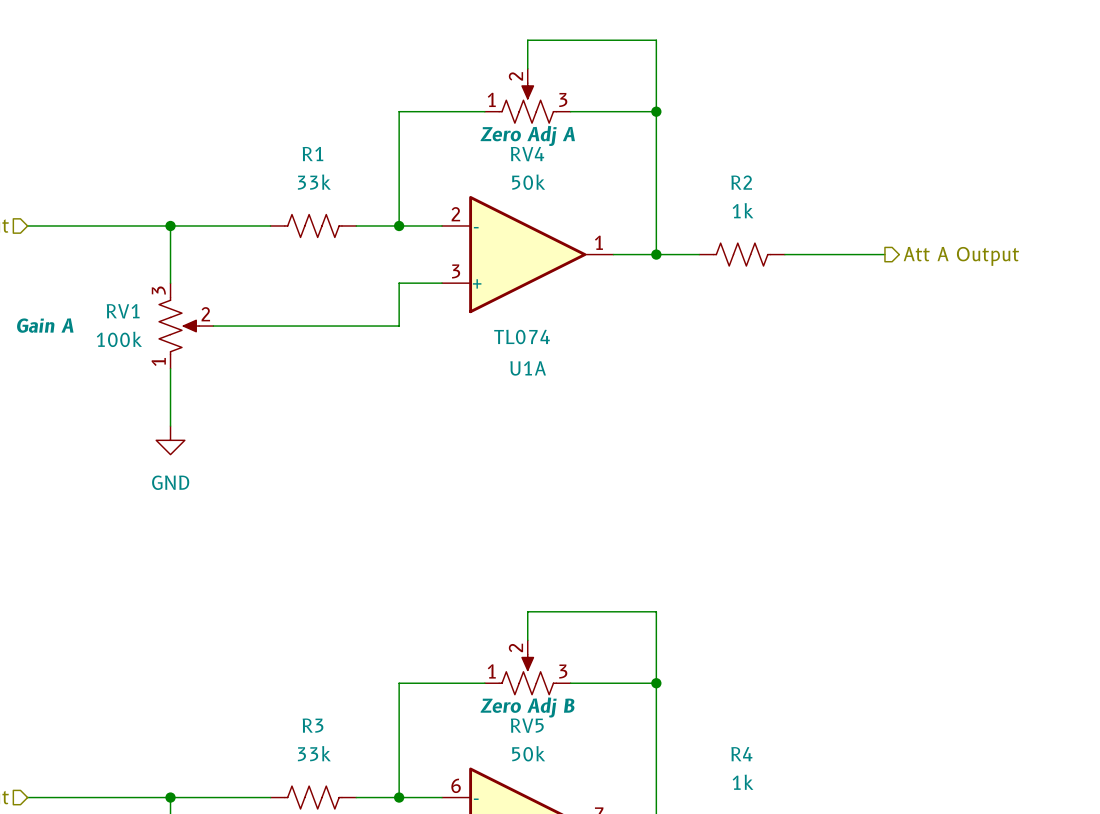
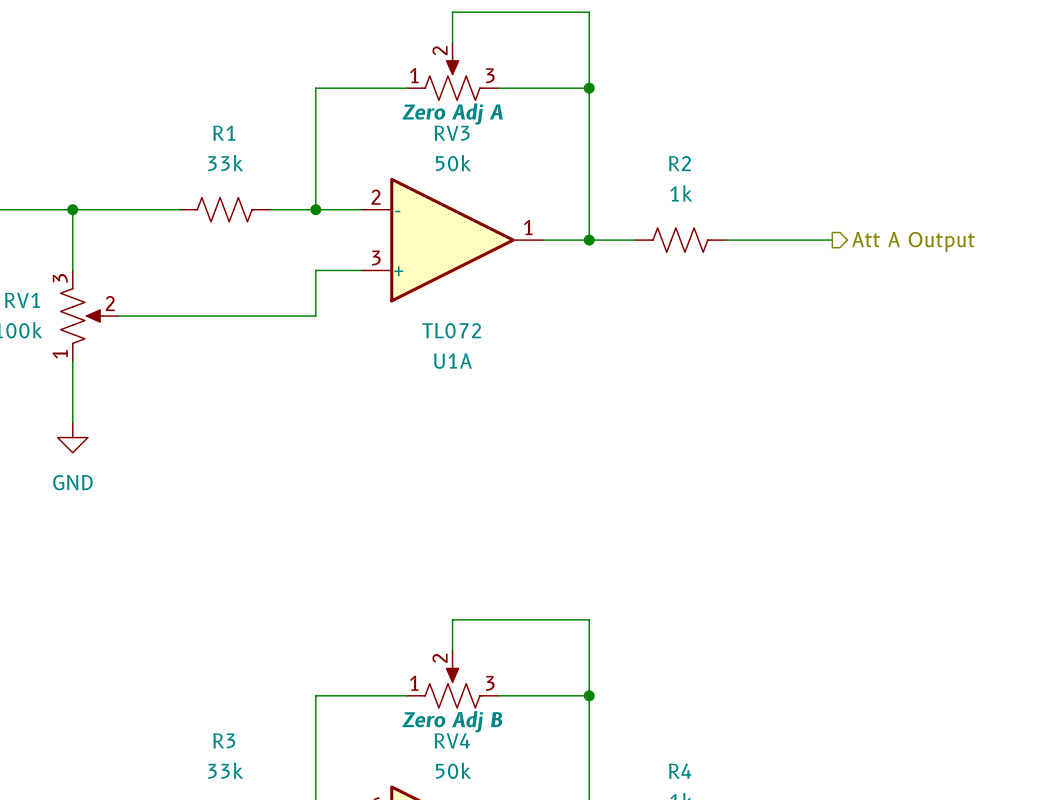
RV4 name: RV4 (527, 154) -> RV3 (452, 133)
U1A value: TL074 (522, 336) -> TL072 (451, 330)
RV5 name: RV5 (527, 725) -> RV4 (452, 740)

